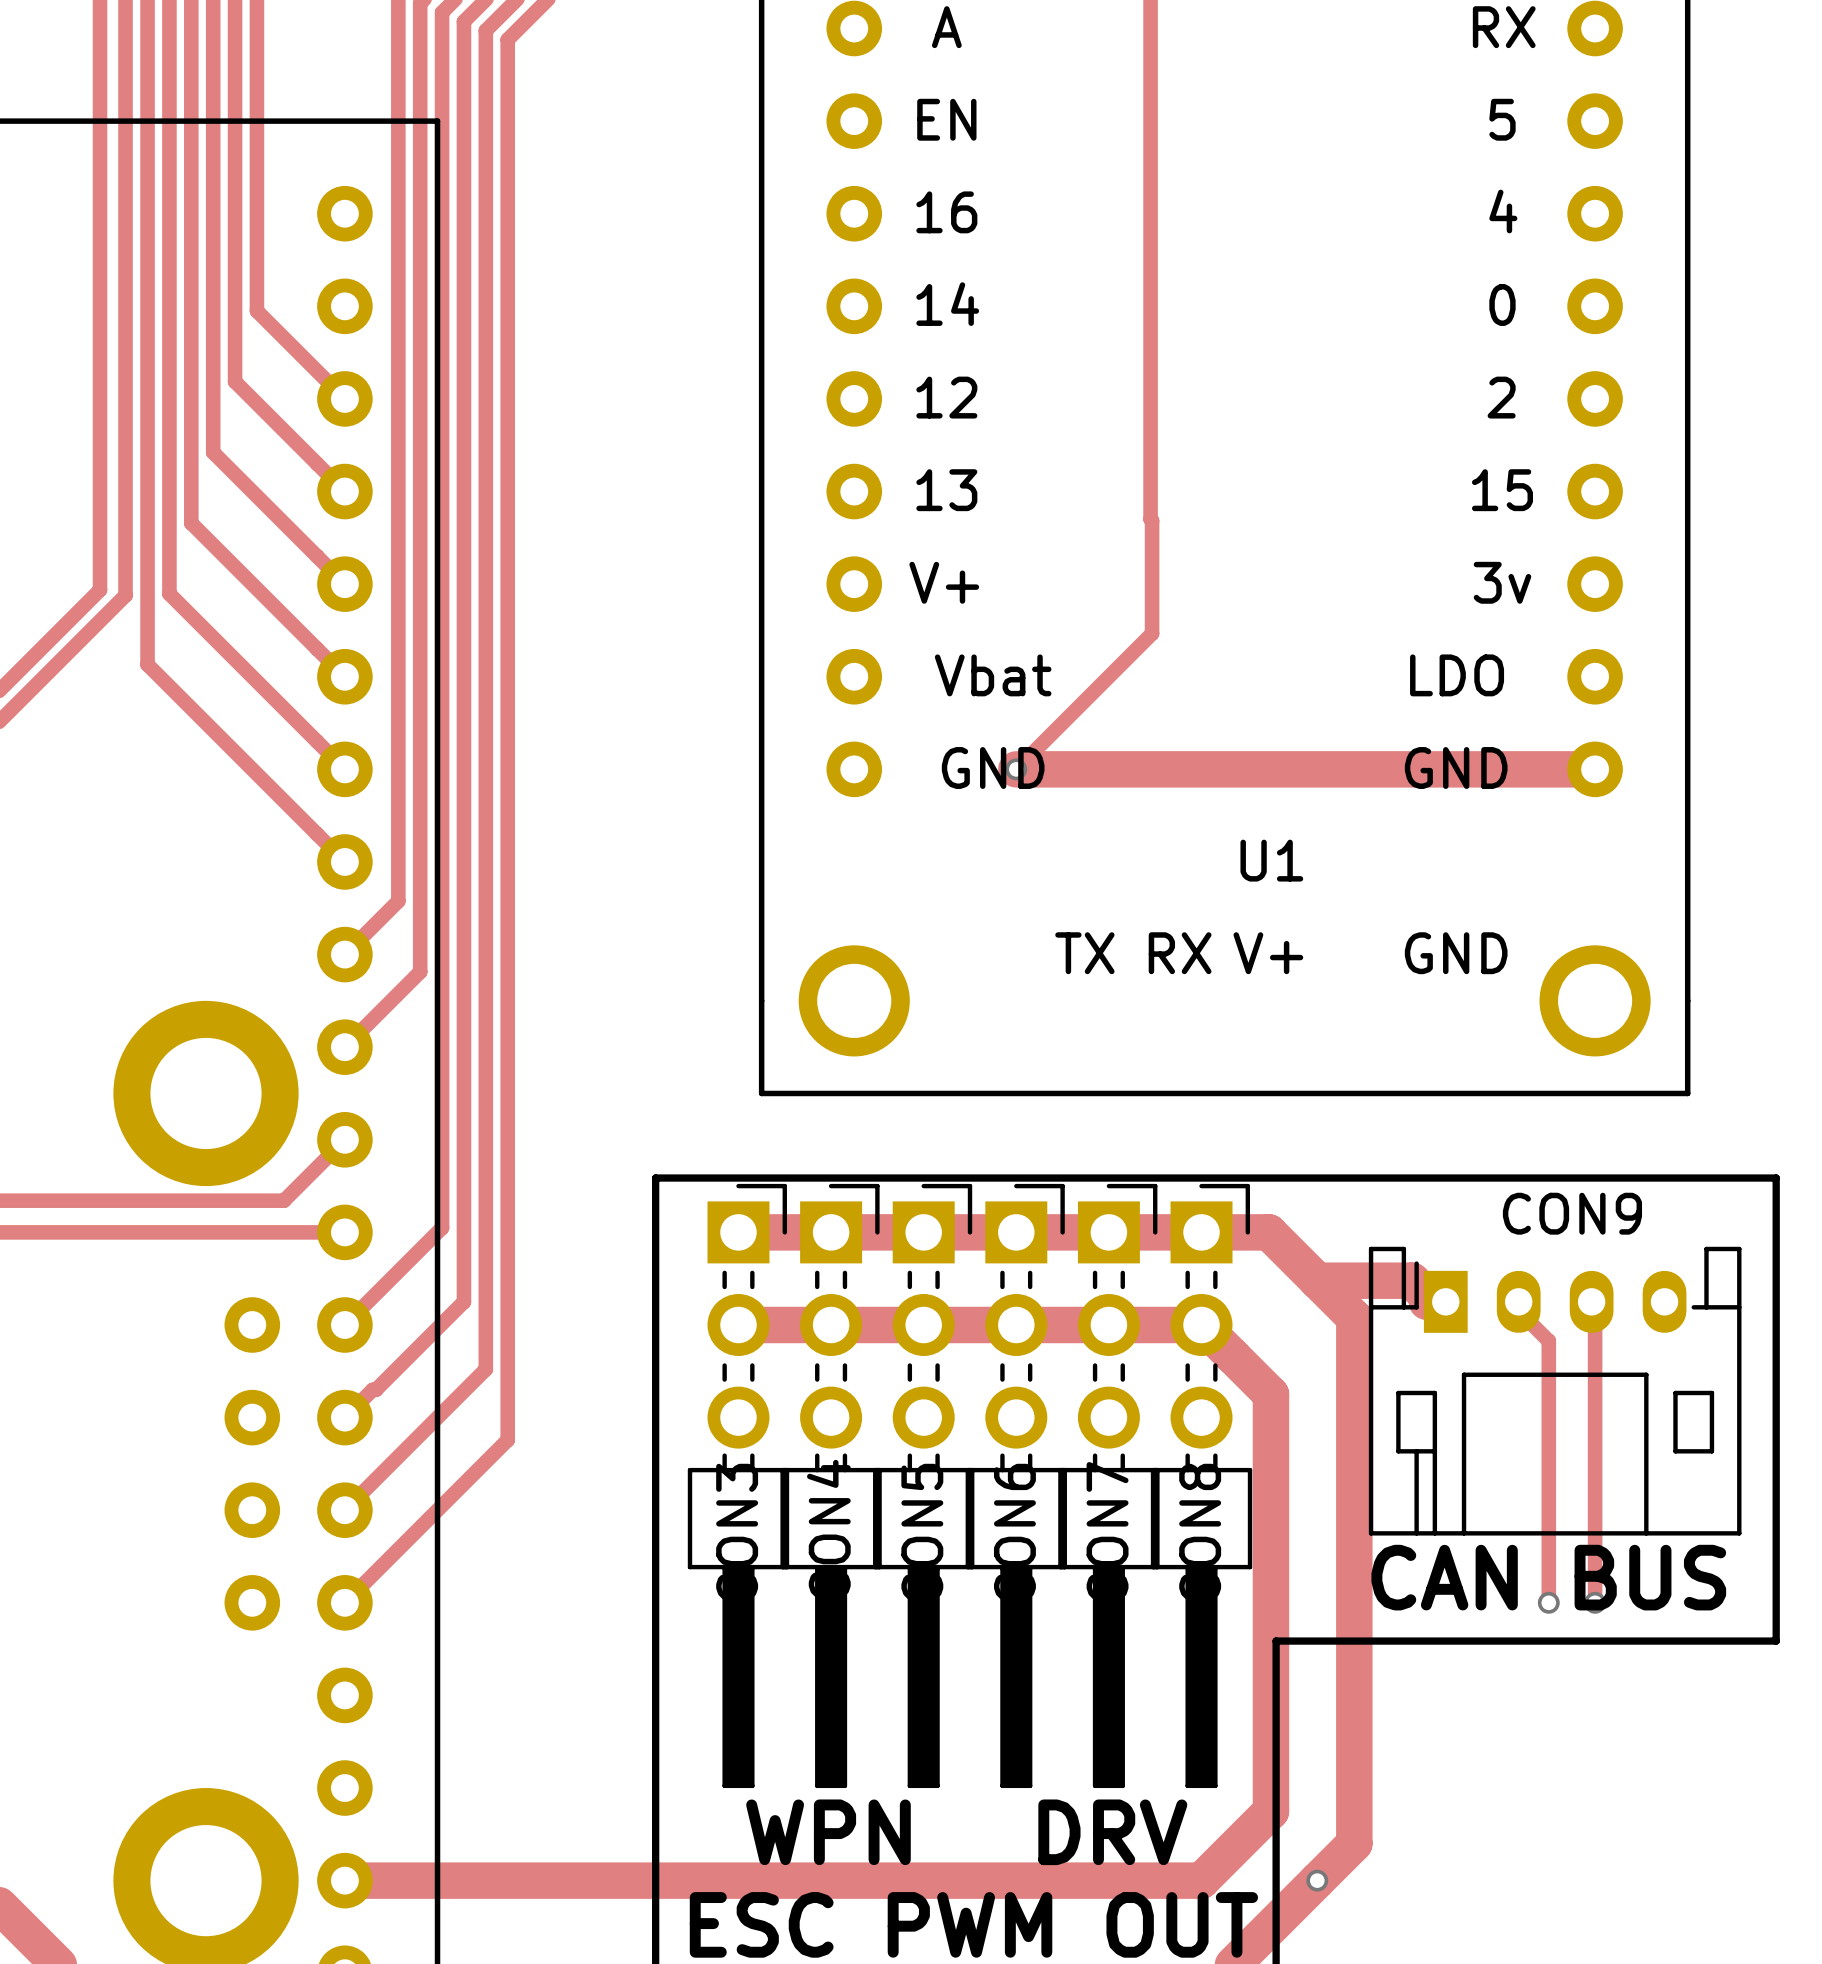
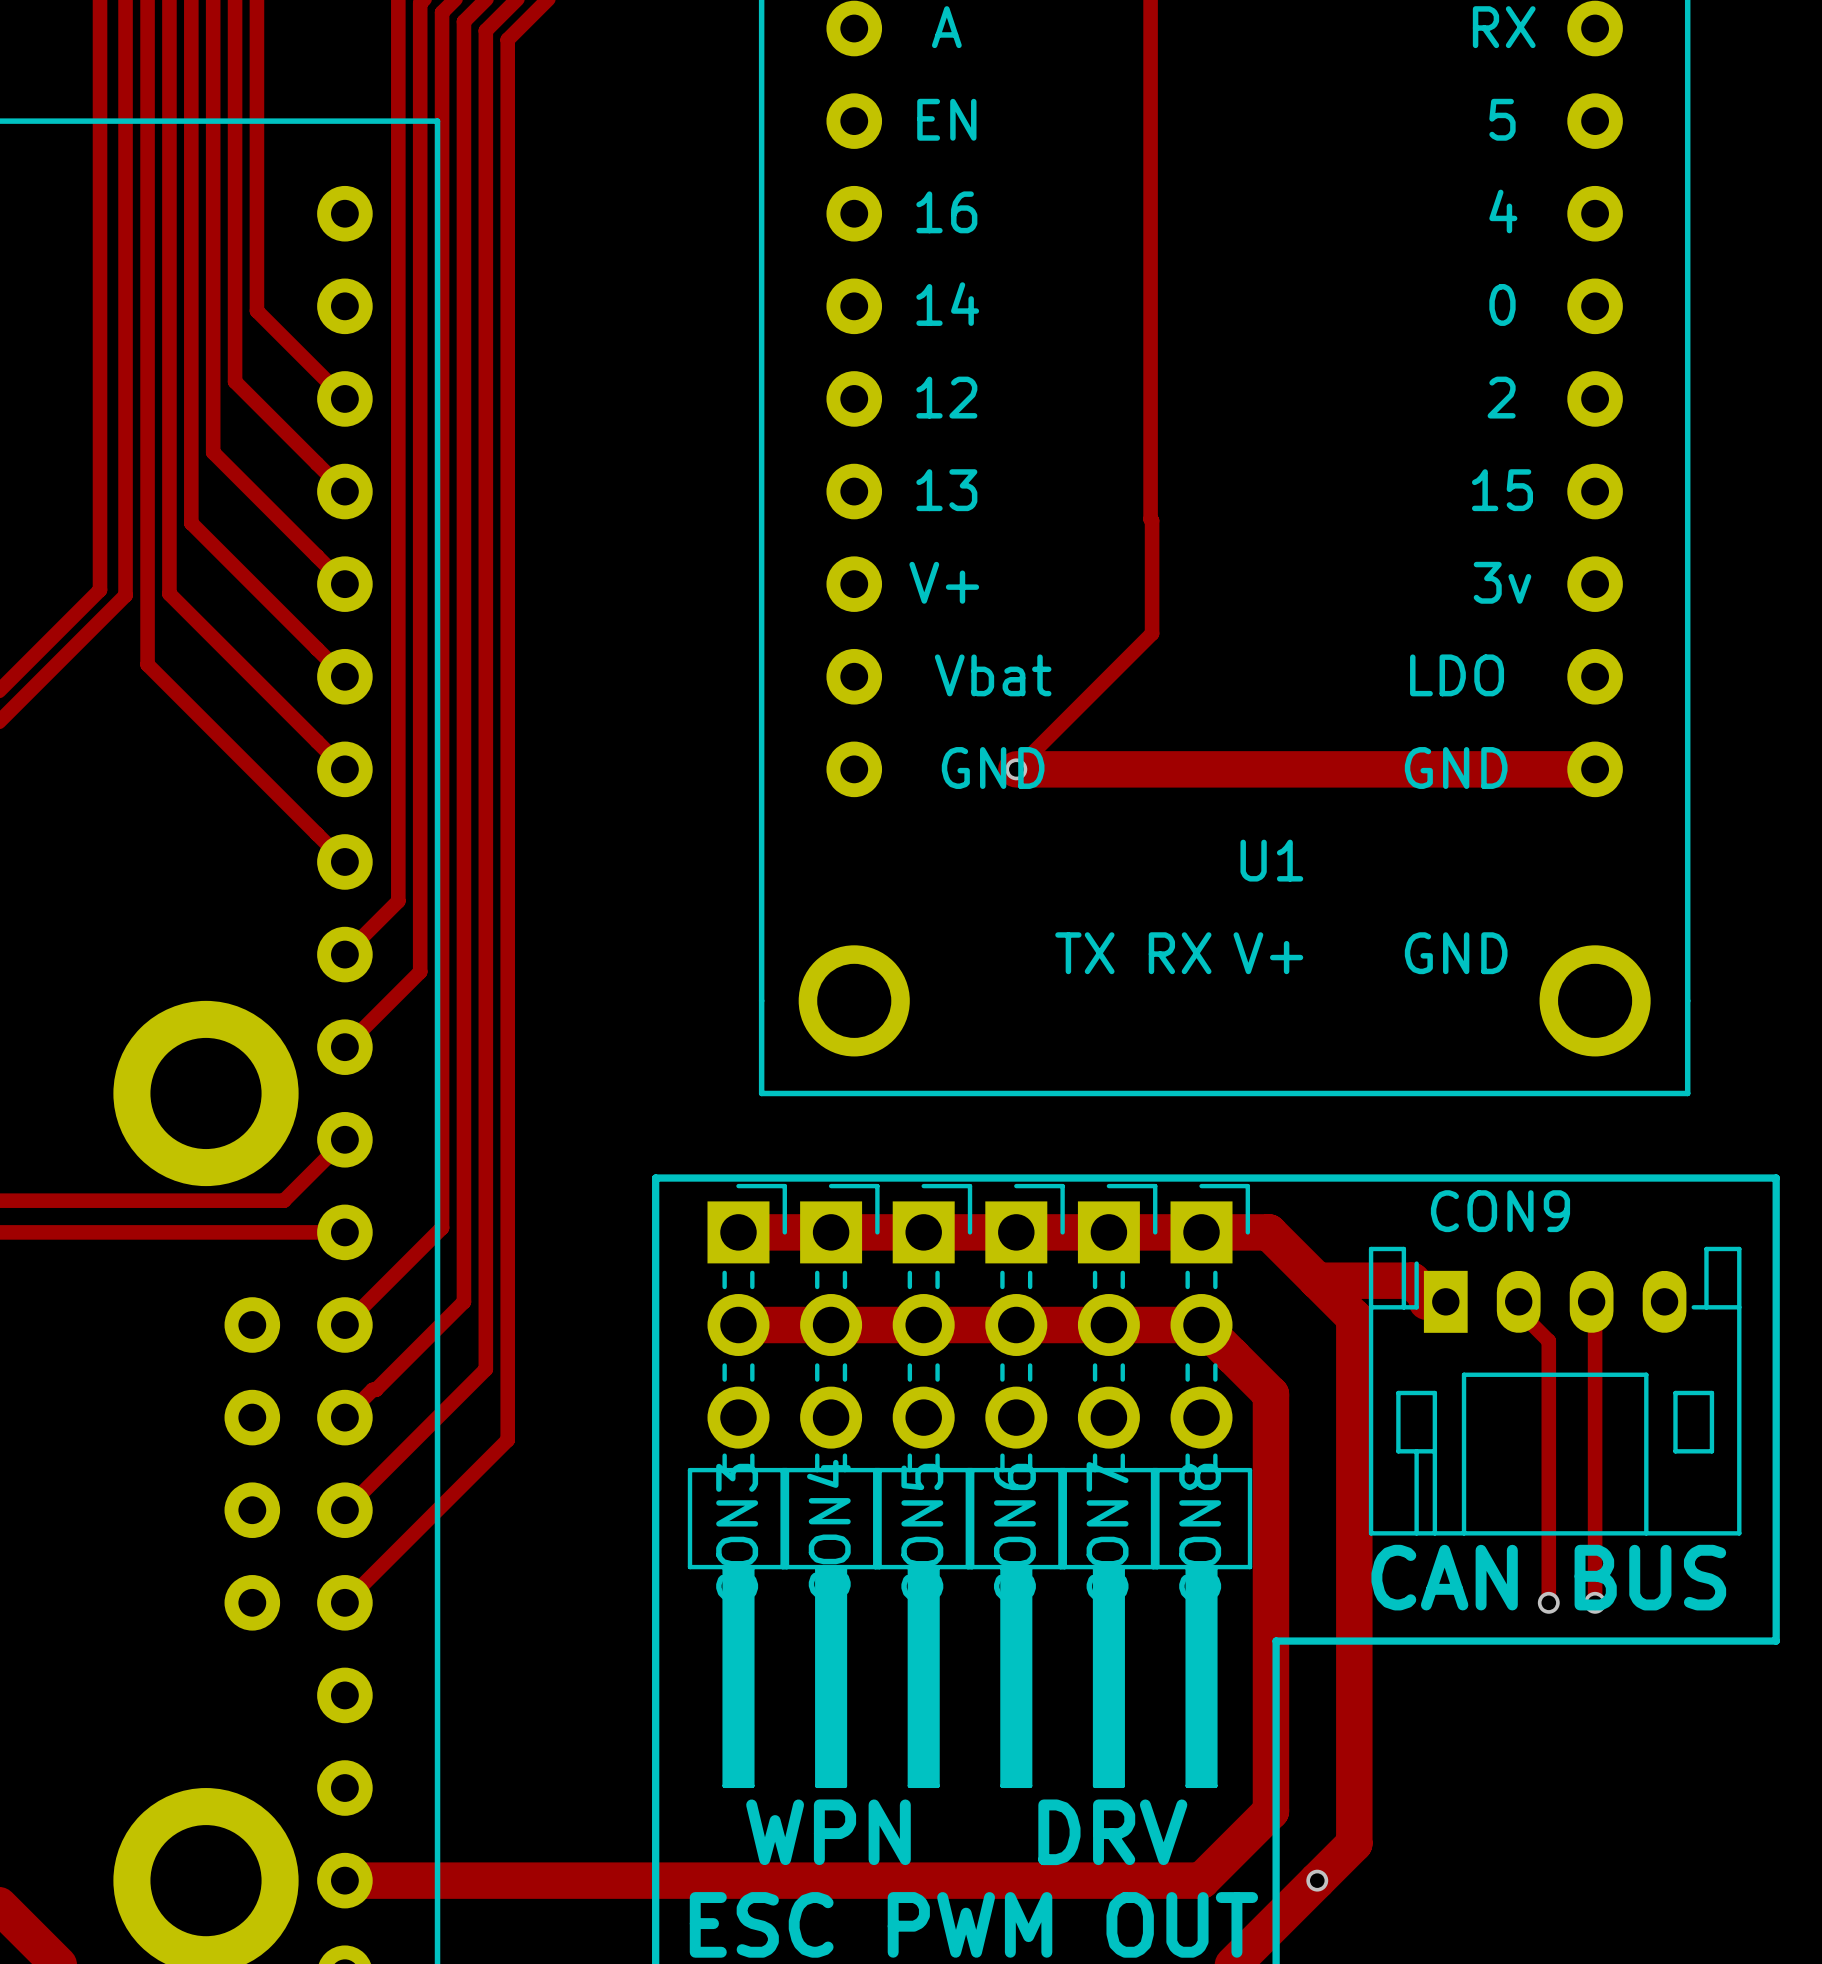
CON9 name position: CON9 (1572, 1213) -> CON9 (1500, 1211)

